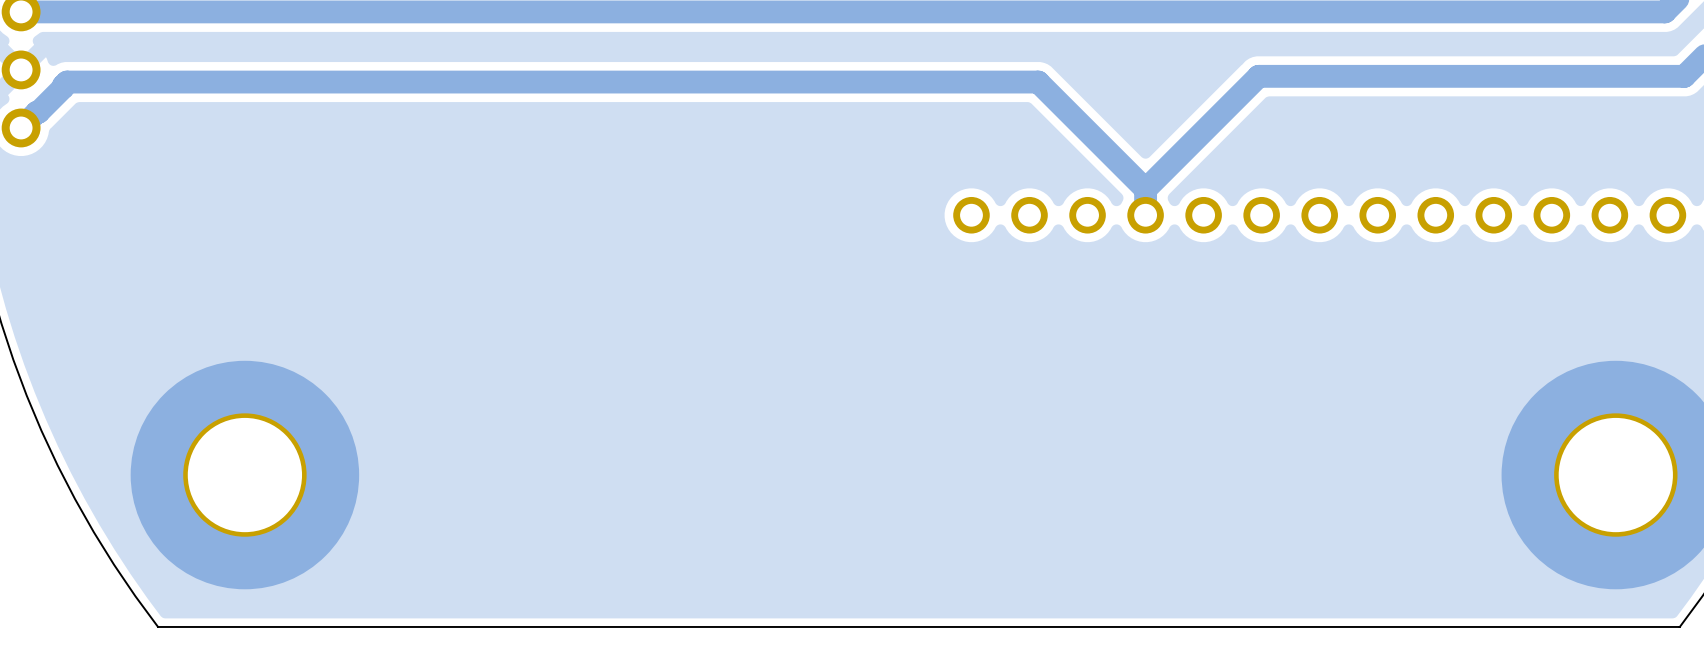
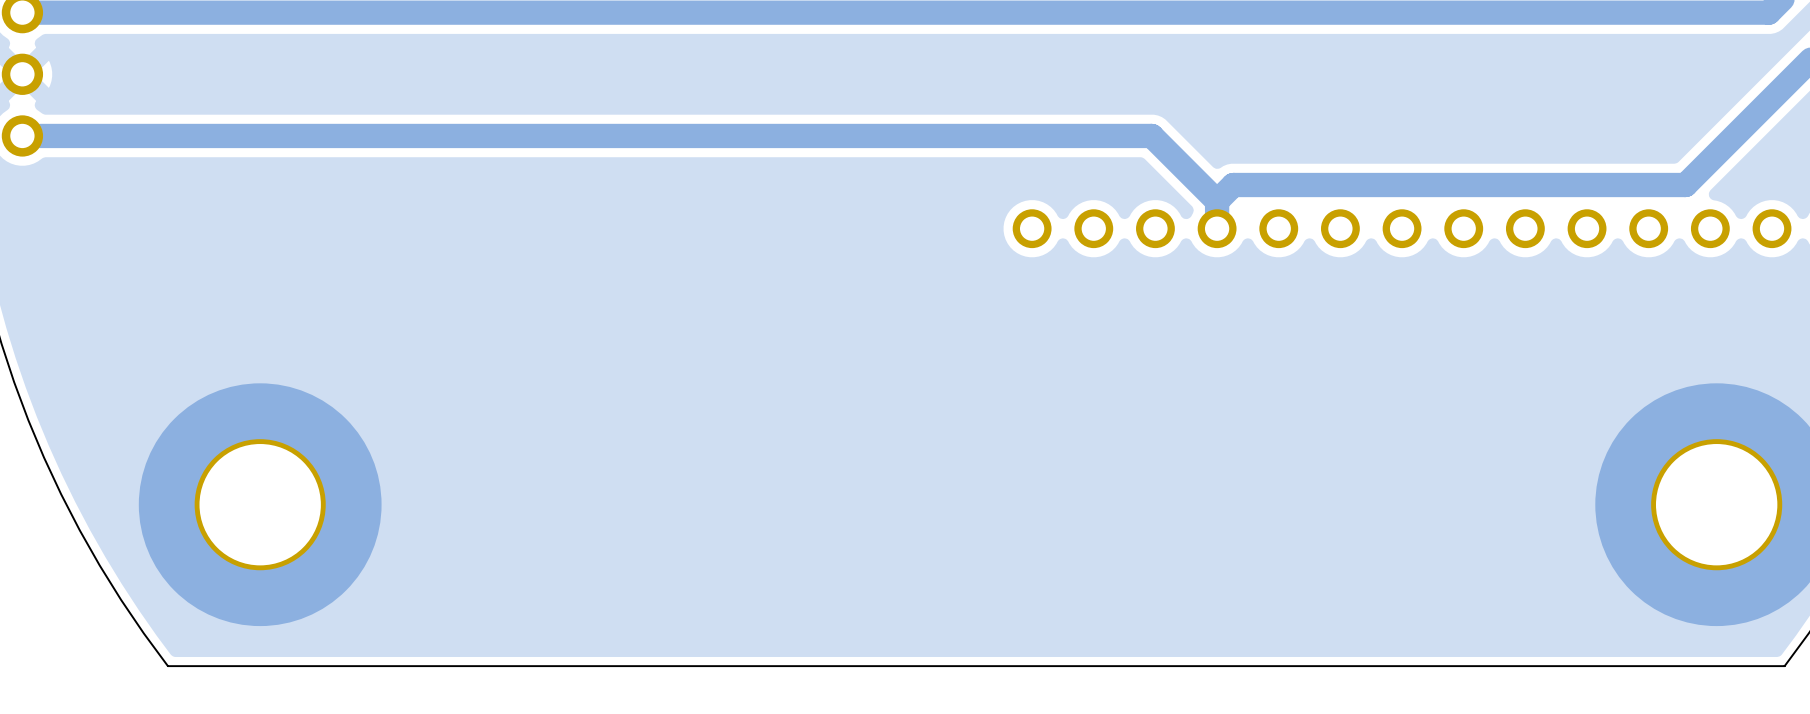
track: (1684, 76) (1258, 76) (1160, 174) -> (1789, 81) (1685, 185) (1233, 185)
track: (1084, 127) (1038, 82) (67, 82) (21, 127) -> (1151, 135) (22, 135)

